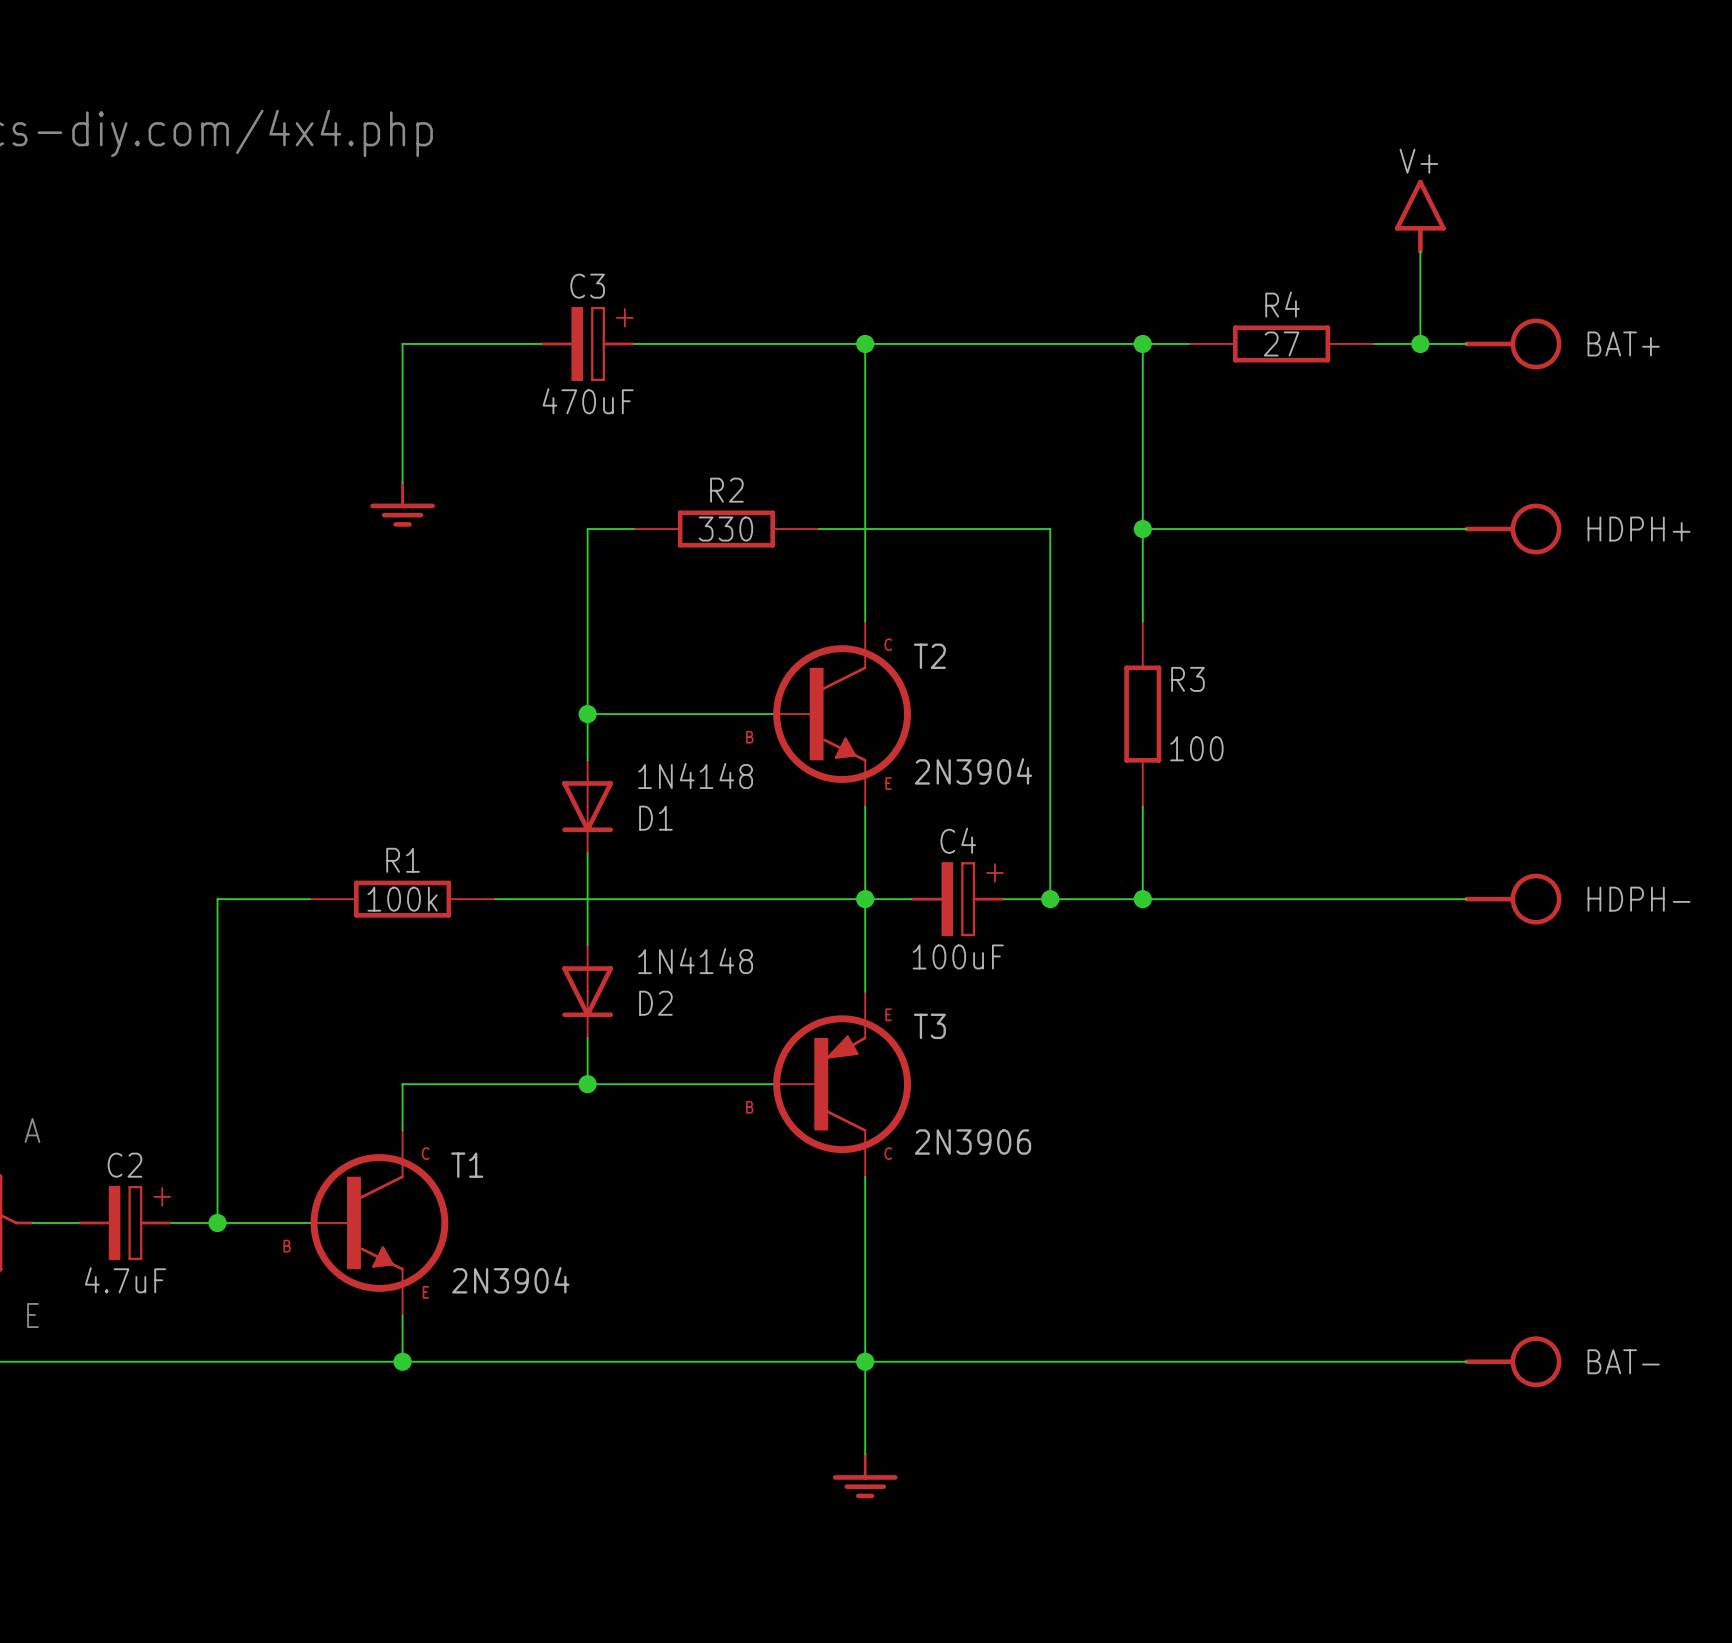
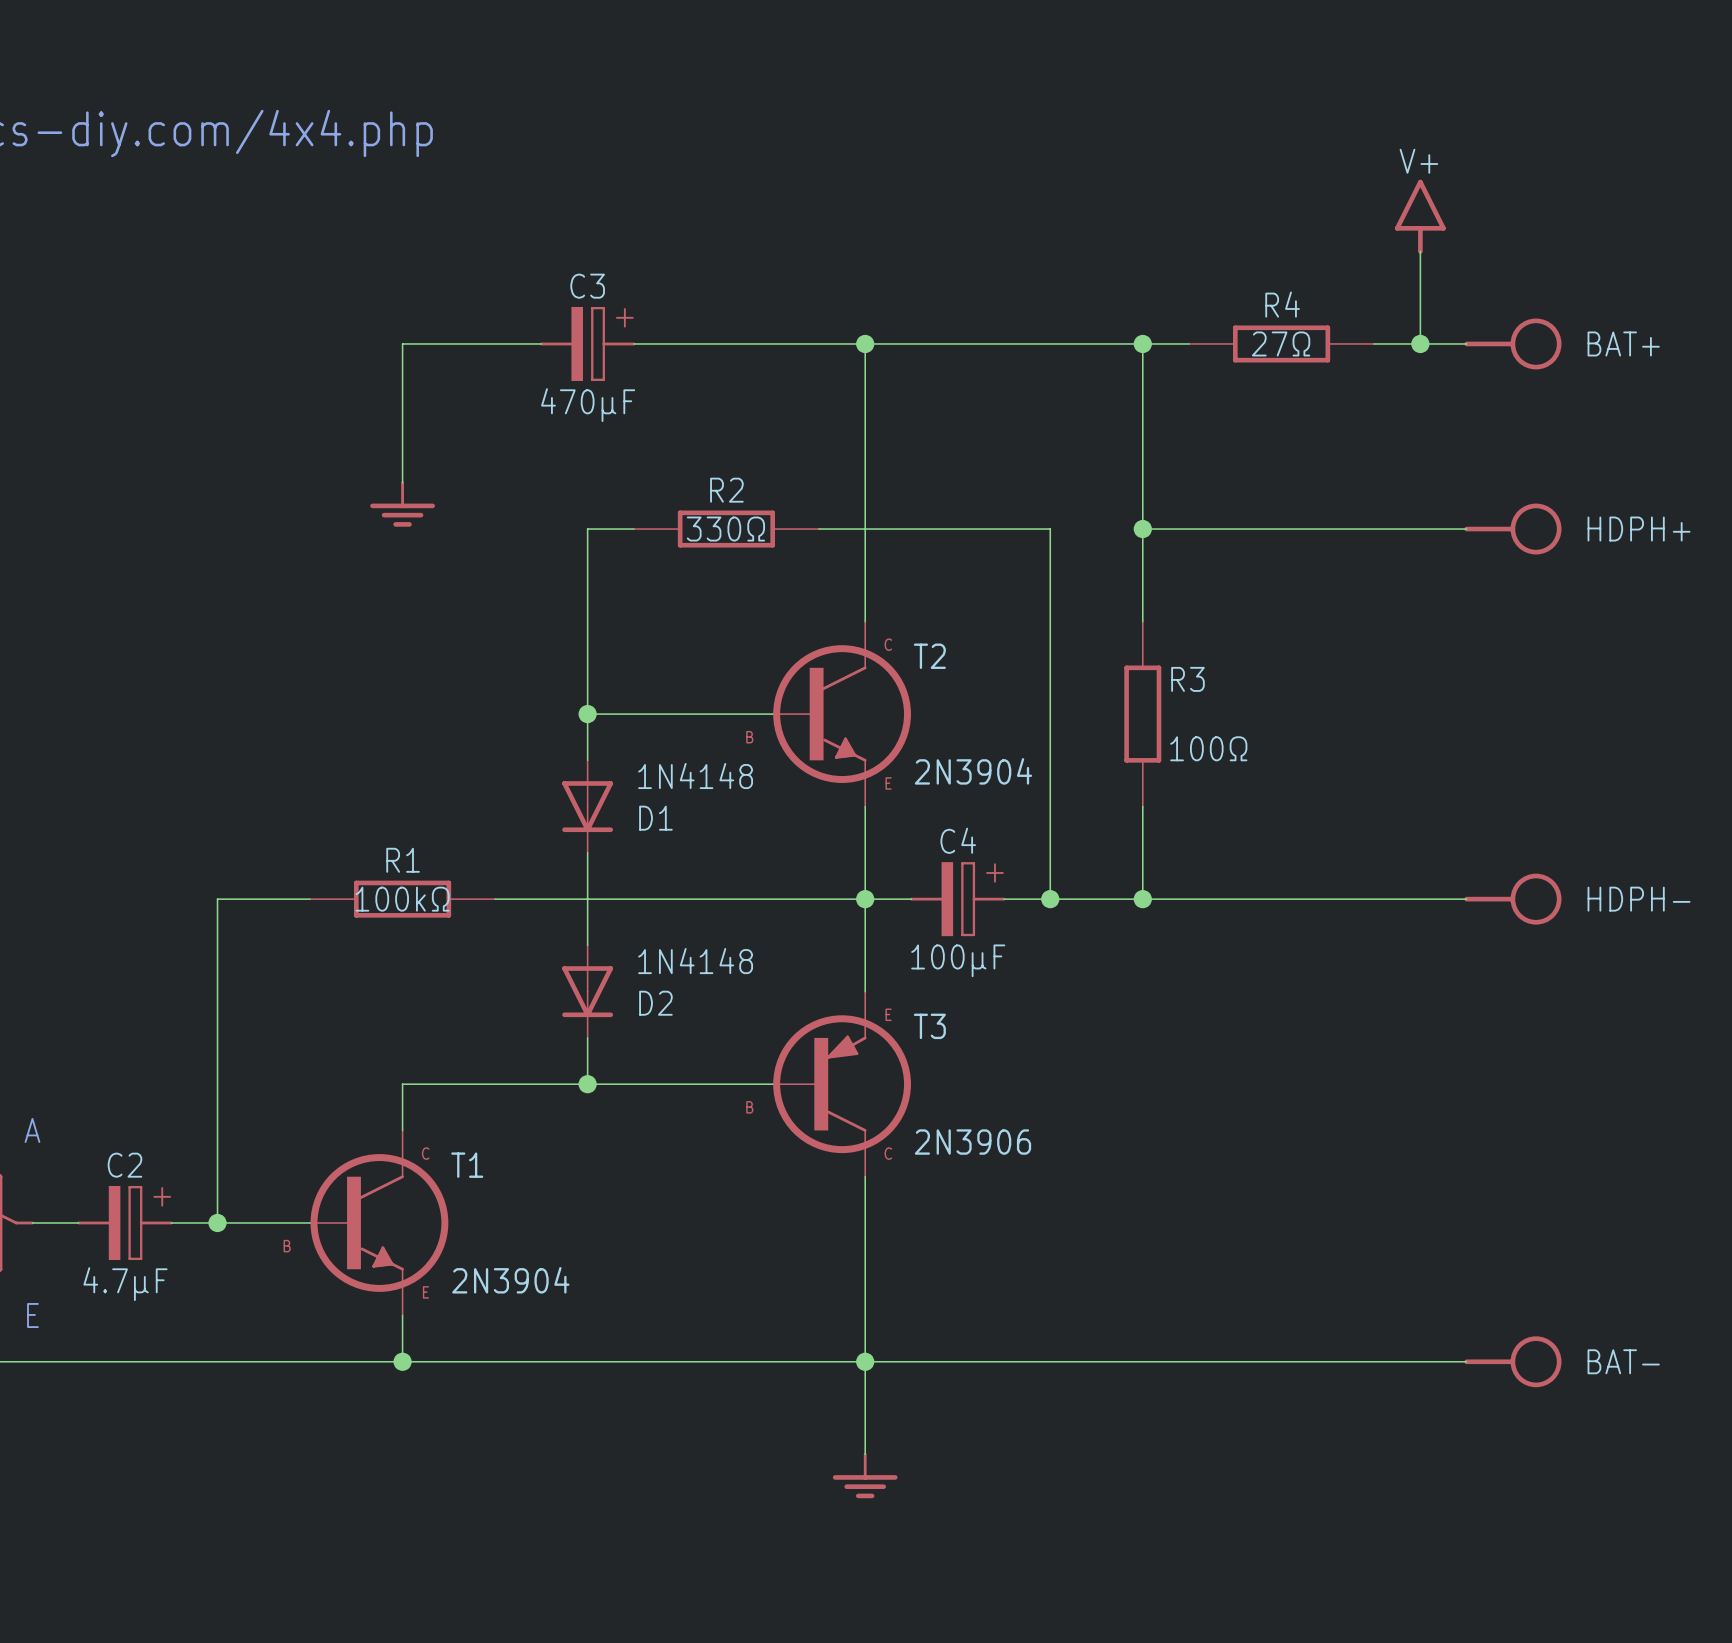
R4 value: 27 (1281, 343) -> 27Ω (1281, 343)
C3 value: 470uF (588, 401) -> 470μF (588, 405)
R2 value: 330 (725, 529) -> 330Ω (725, 529)
R3 value: 100 (1196, 748) -> 100Ω (1208, 748)
R1 value: 100k (402, 899) -> 100kΩ (402, 899)
C4 value: 100uF (958, 956) -> 100μF (958, 960)
C2 value: 4.7uF (125, 1280) -> 4.7μF (125, 1284)

